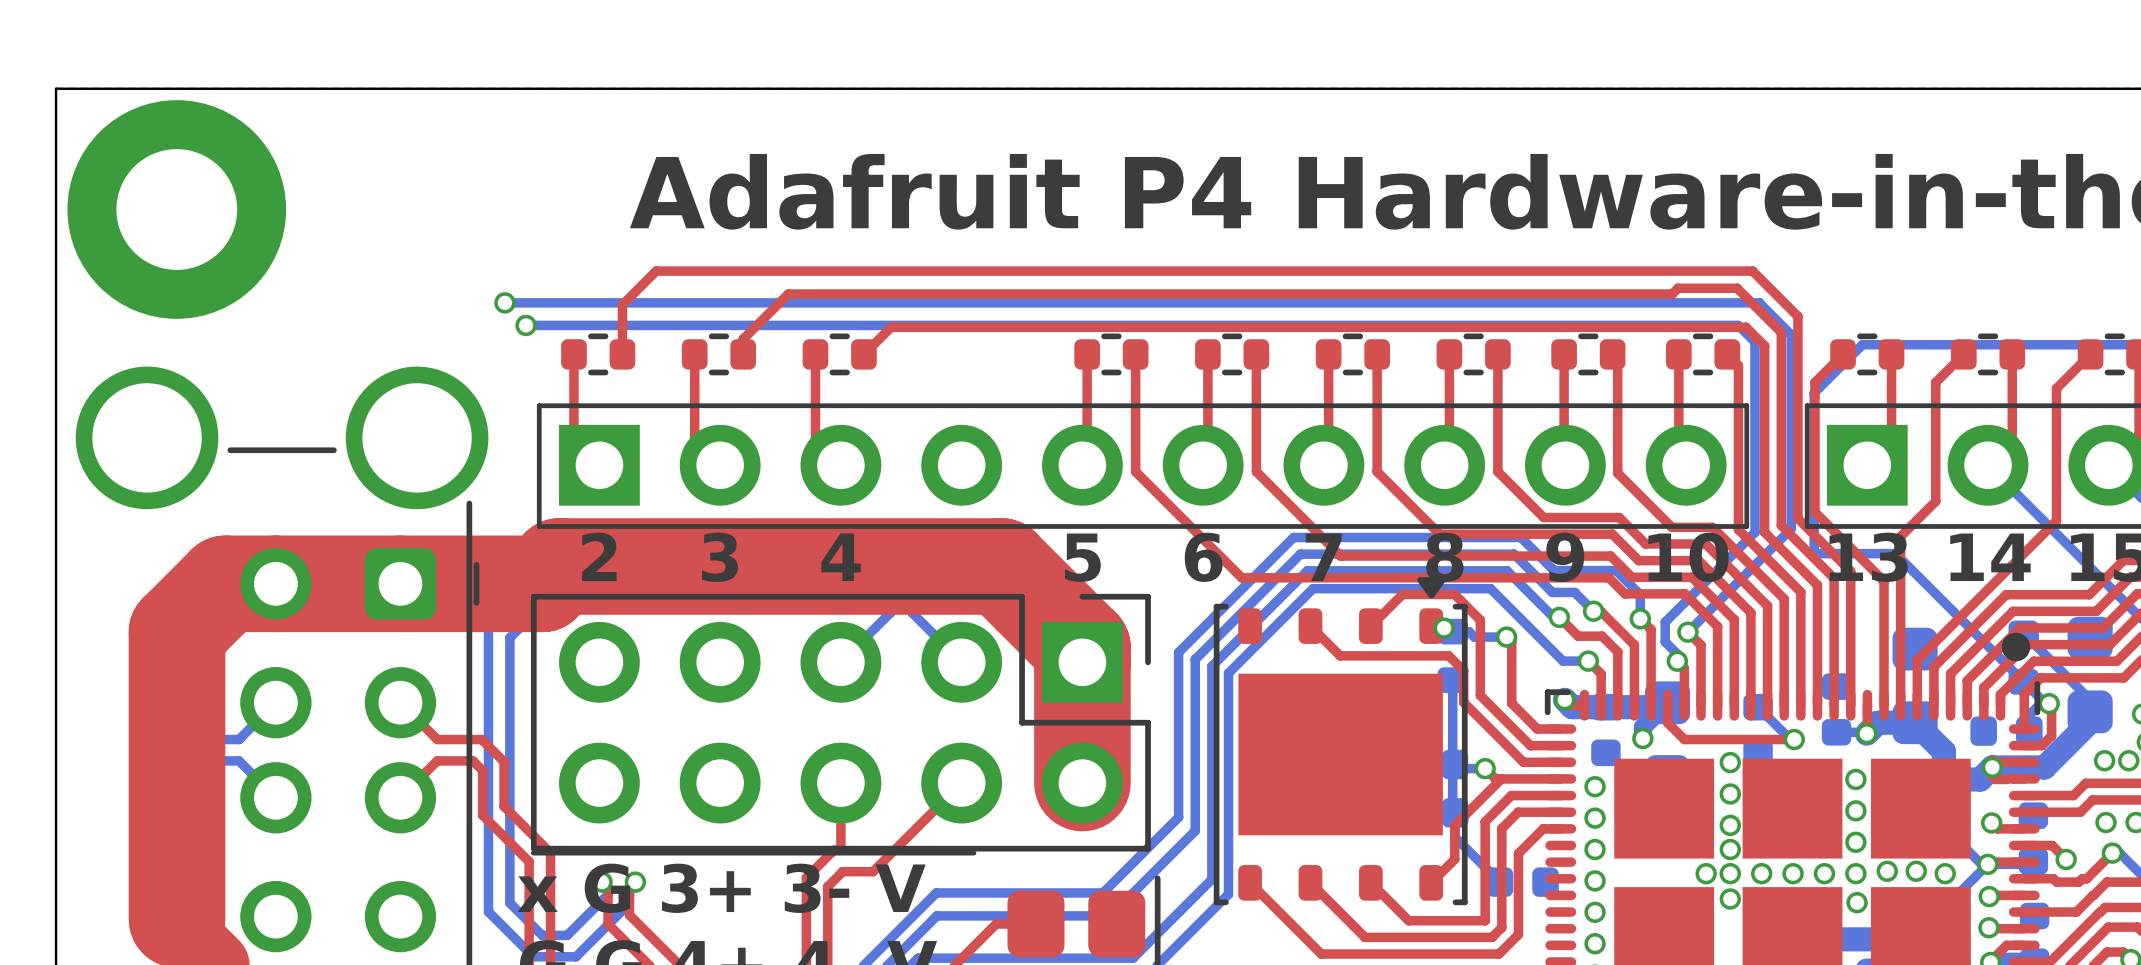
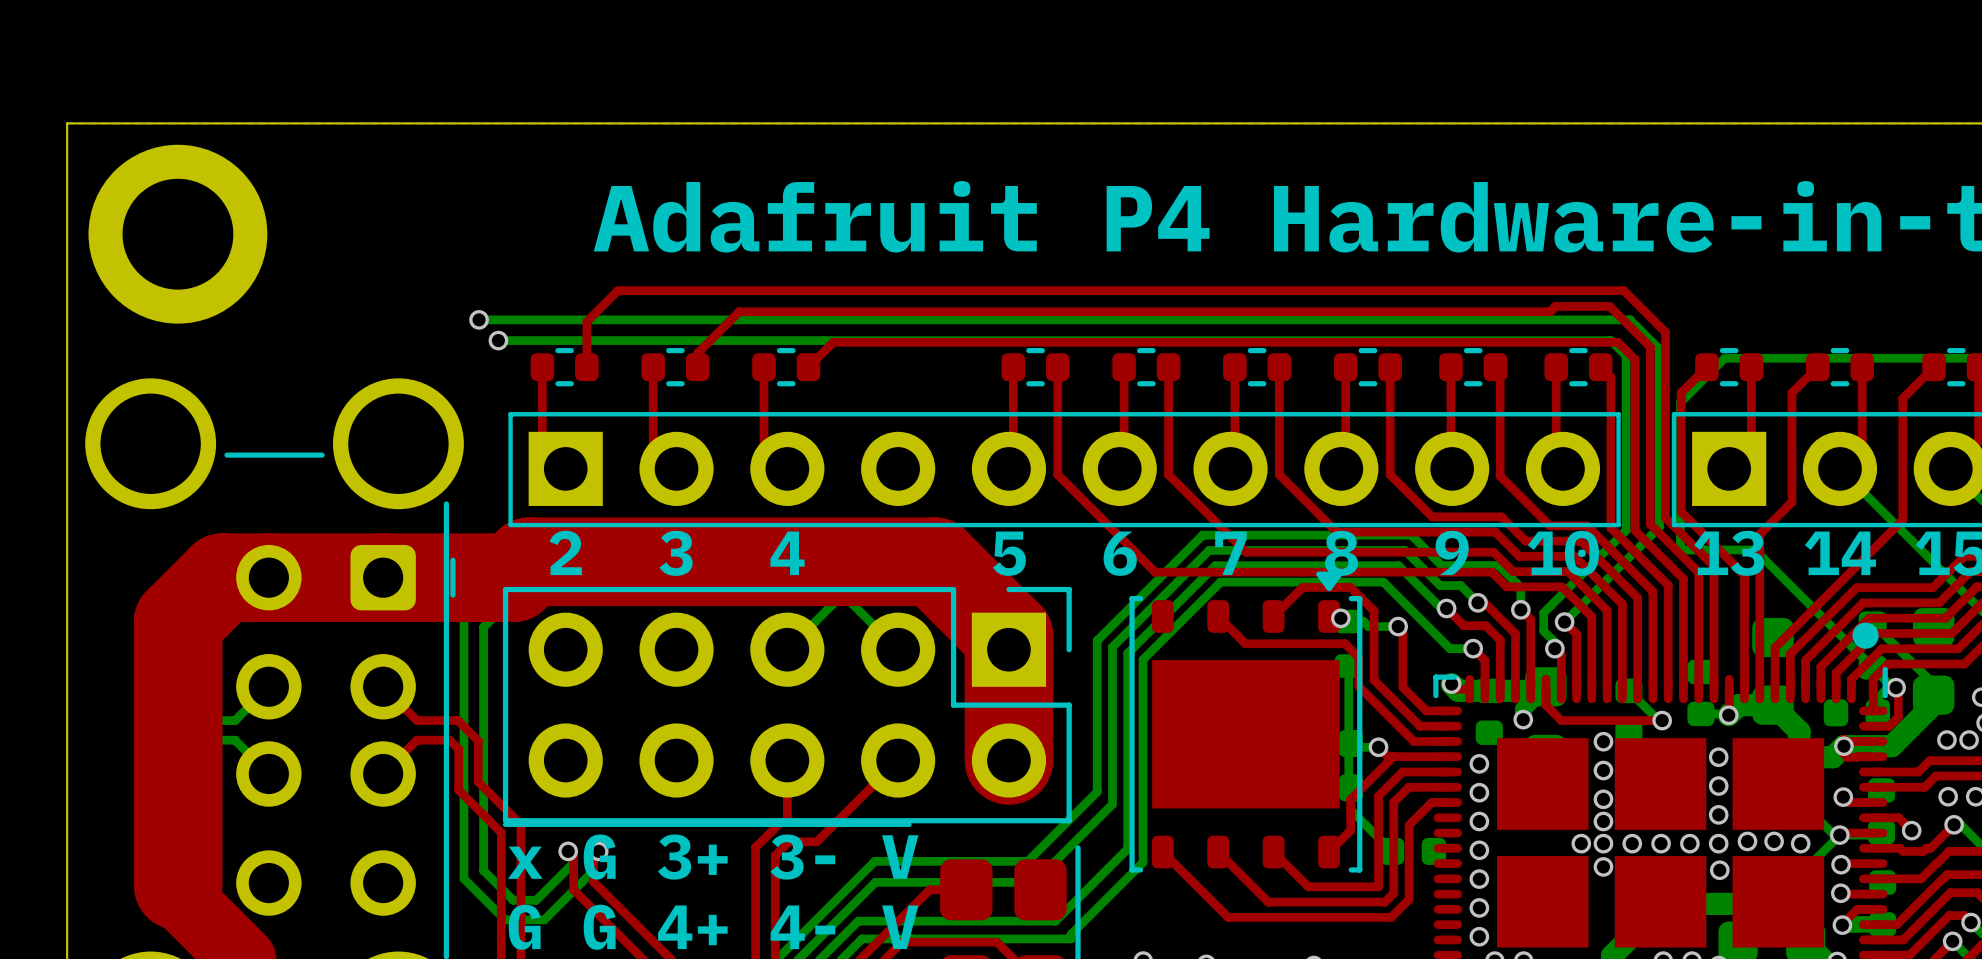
part footprint: [67, 100, 287, 319] -> [88, 144, 268, 324]

